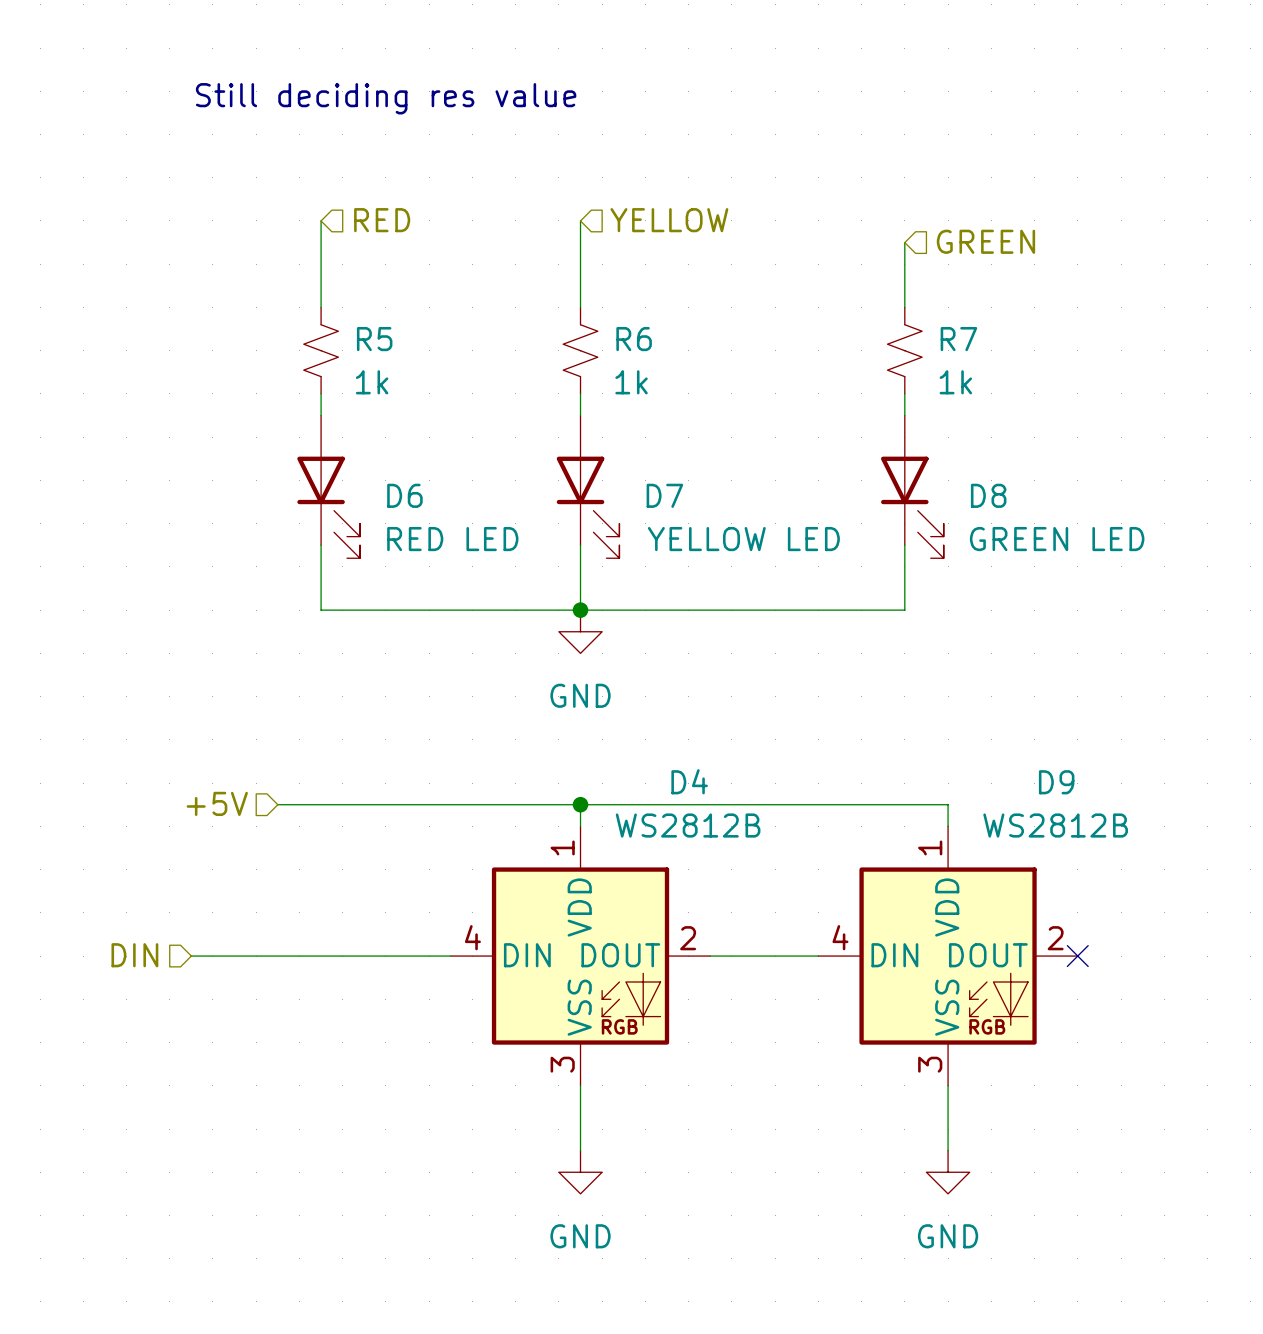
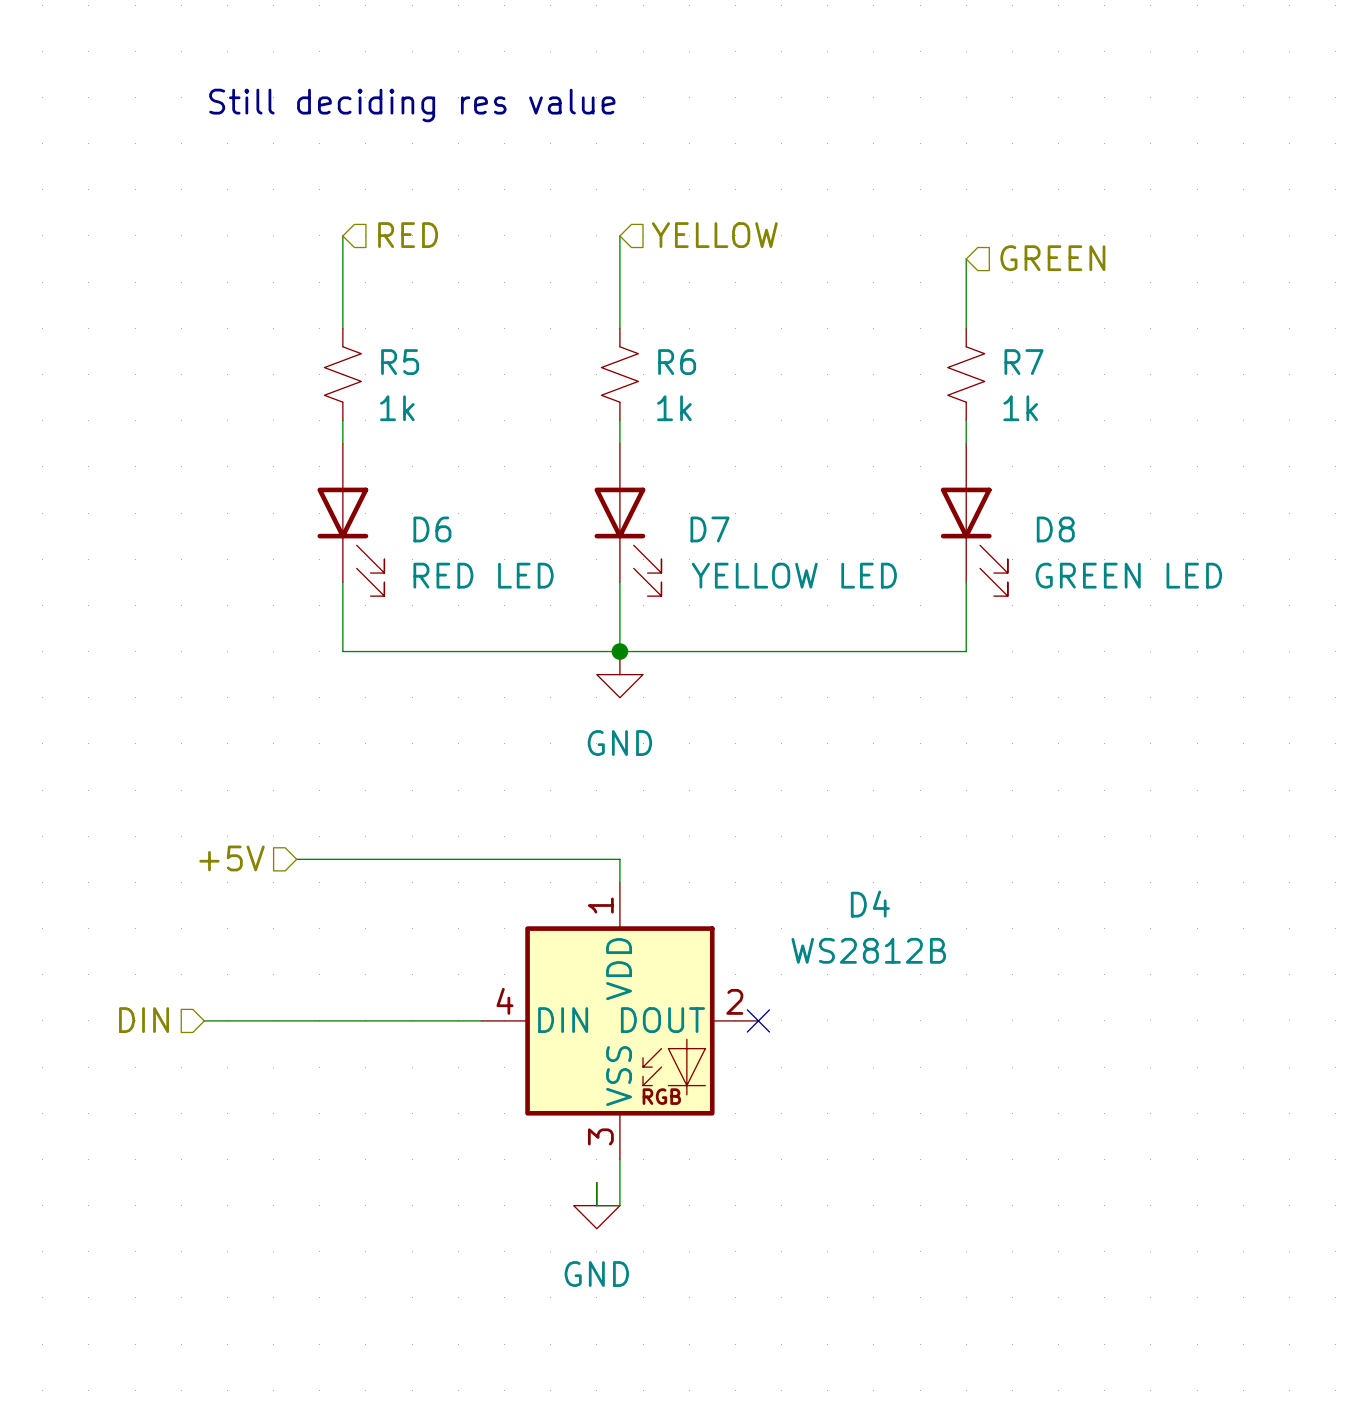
D4 name position: D4 (689, 781) -> D4 (870, 904)
wire: (580, 804) (948, 804) (948, 826) -> none
junction: (580, 804) -> none
D4 value position: WS2812B (688, 825) -> WS2812B (868, 950)
wire: (710, 956) (818, 956) -> none
no-connect mark: none -> (758, 1020)
D9: WS2812B (948, 956) -> none
no-connect mark: (1077, 956) -> none
wire: (948, 1085) (948, 1150) -> none
wire: (580, 1129) (580, 1150) -> (619, 1205) (596, 1205) (596, 1182)
power symbol position: GND (580, 1172) -> GND (596, 1205)
power symbol: GND (948, 1172) -> none

